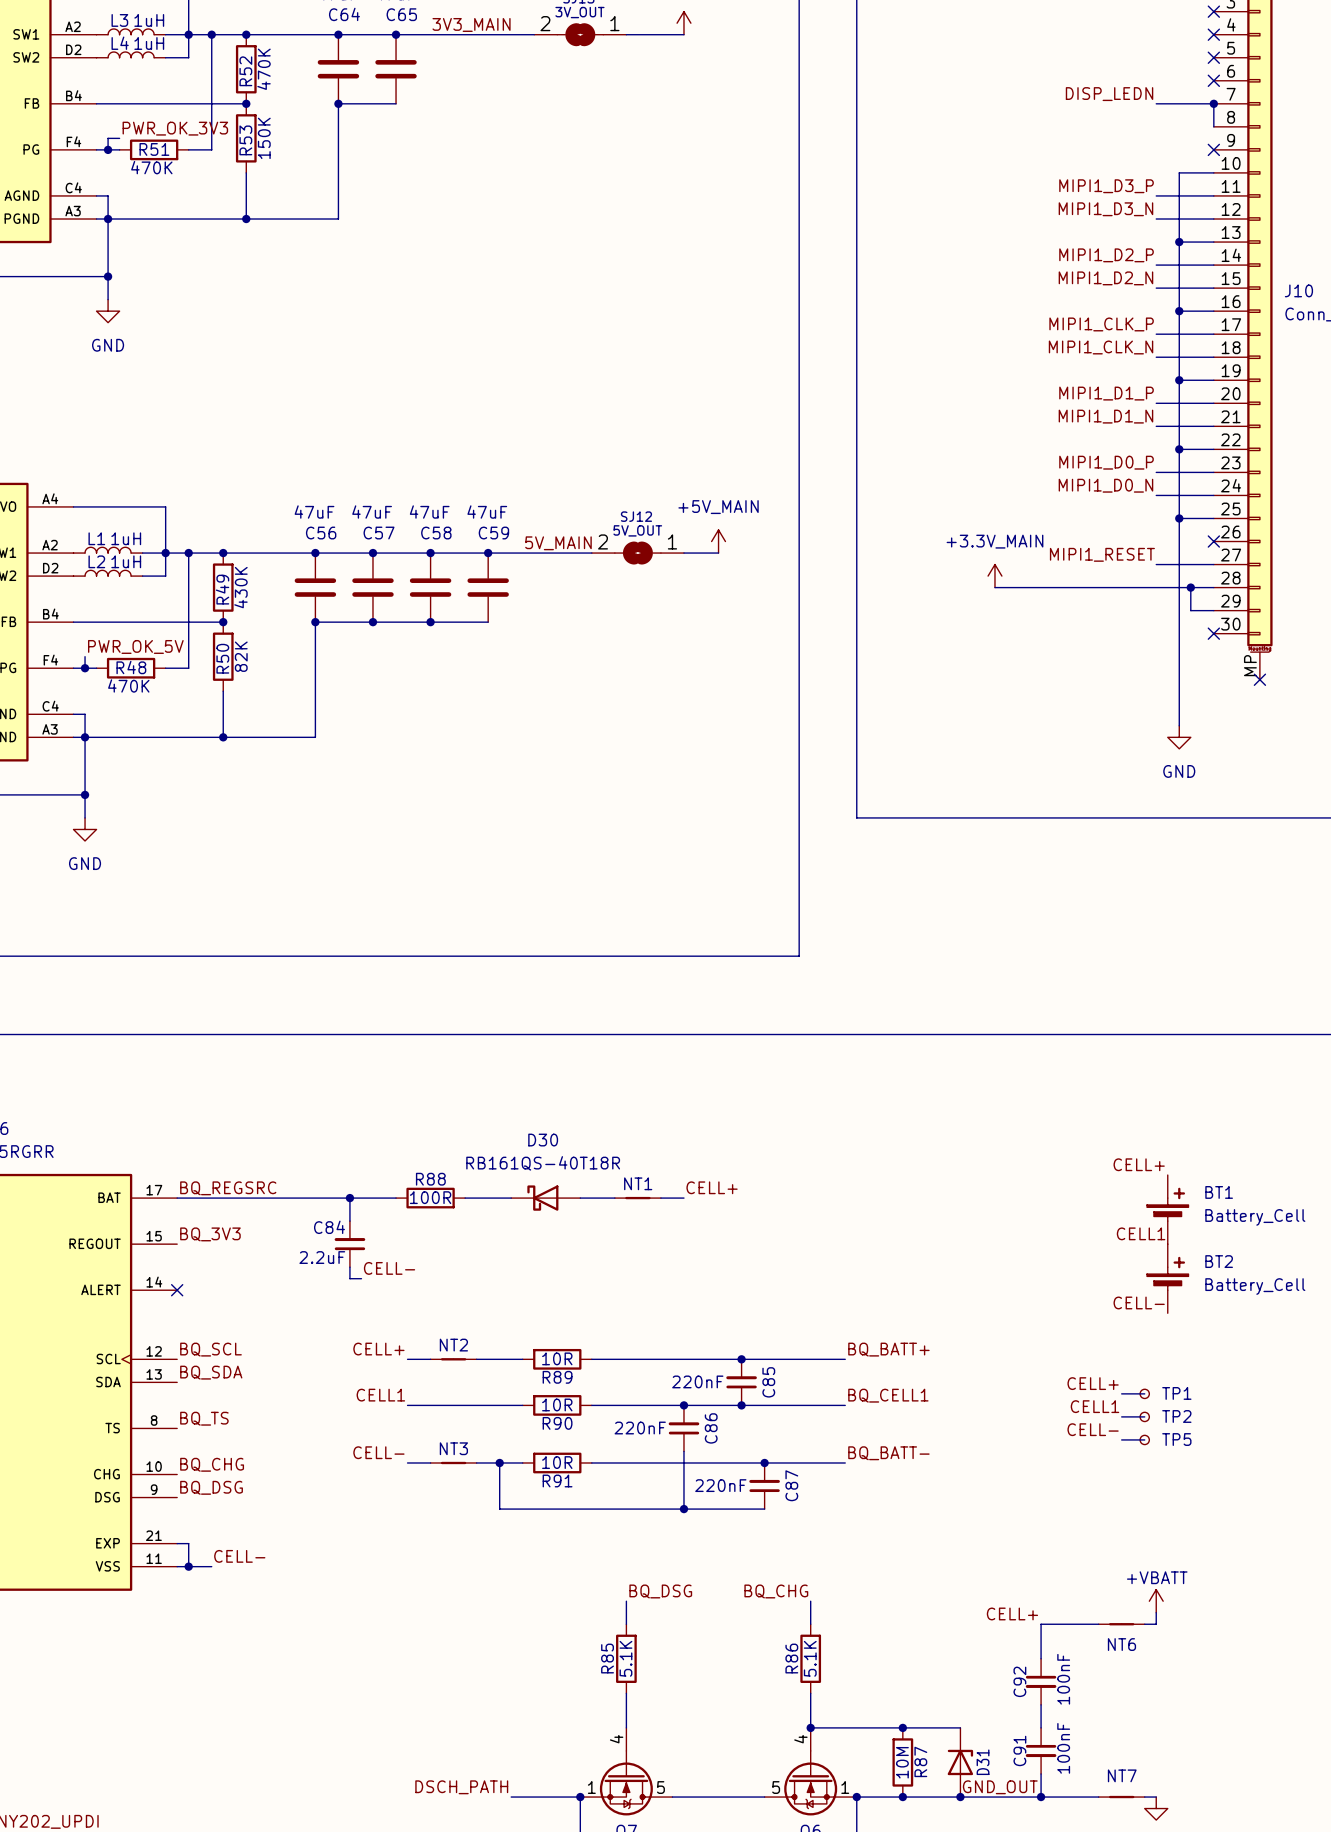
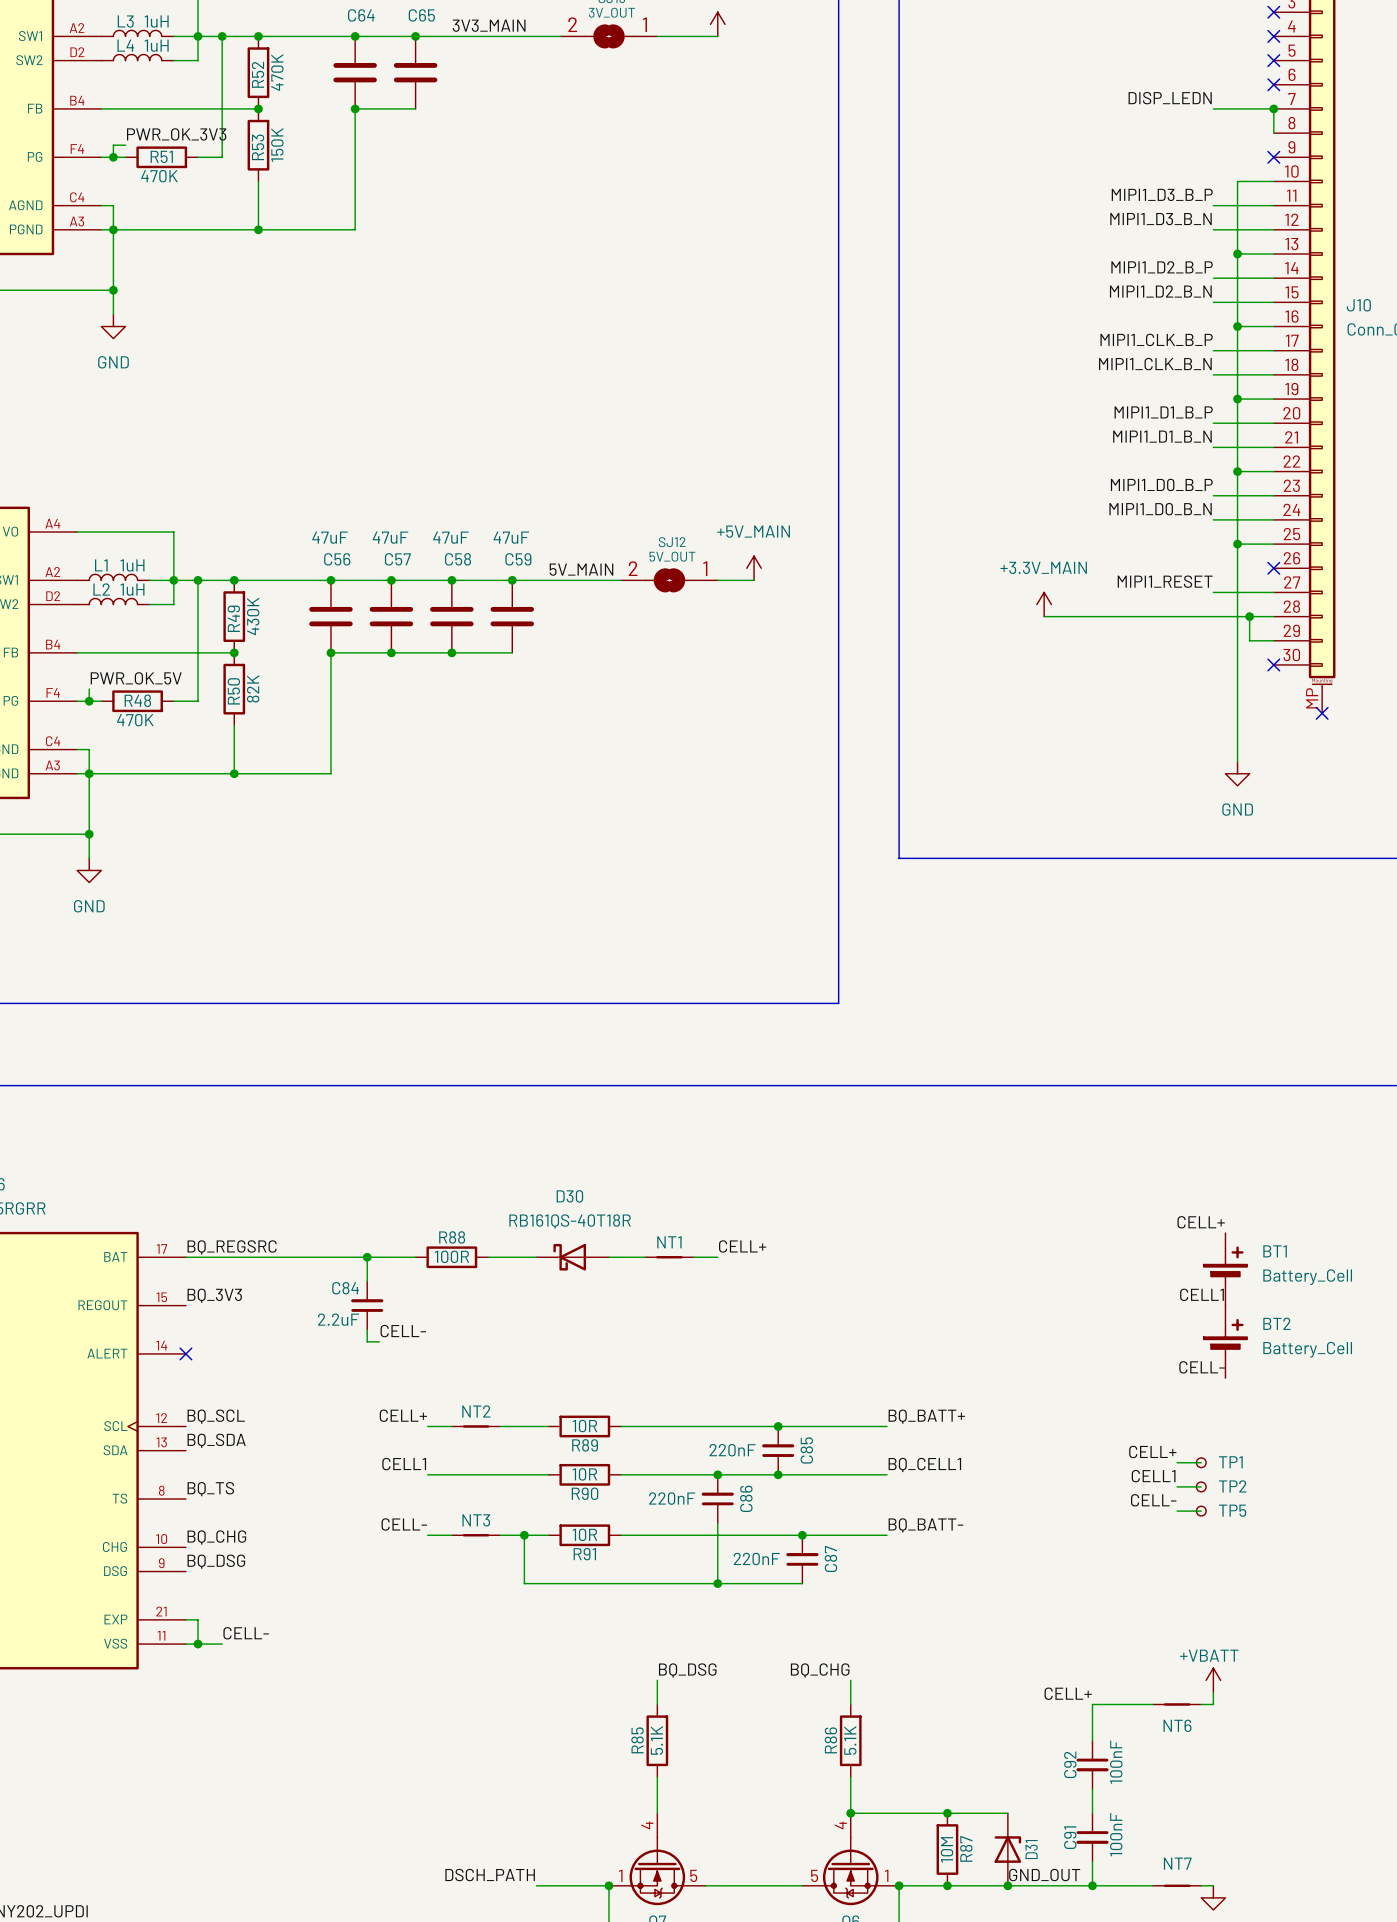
label: MIPI1_D3_P (1106, 186) -> MIPI1_D3_B_P (1162, 194)
label: MIPI1_D3_N (1105, 209) -> MIPI1_D3_B_N (1161, 219)
label: MIPI1_D2_P (1106, 255) -> MIPI1_D2_B_P (1162, 267)
label: MIPI1_D2_N (1105, 278) -> MIPI1_D2_B_N (1160, 291)
label: MIPI1_CLK_P (1101, 324) -> MIPI1_CLK_B_P (1156, 339)
label: MIPI1_CLK_N (1101, 347) -> MIPI1_CLK_B_N (1155, 364)
label: MIPI1_D1_P (1106, 393) -> MIPI1_D1_B_P (1163, 412)
label: MIPI1_D1_N (1105, 416) -> MIPI1_D1_B_N (1162, 436)
label: MIPI1_D0_P (1106, 462) -> MIPI1_D0_B_P (1161, 484)
label: MIPI1_D0_N (1105, 485) -> MIPI1_D0_B_N (1160, 509)

